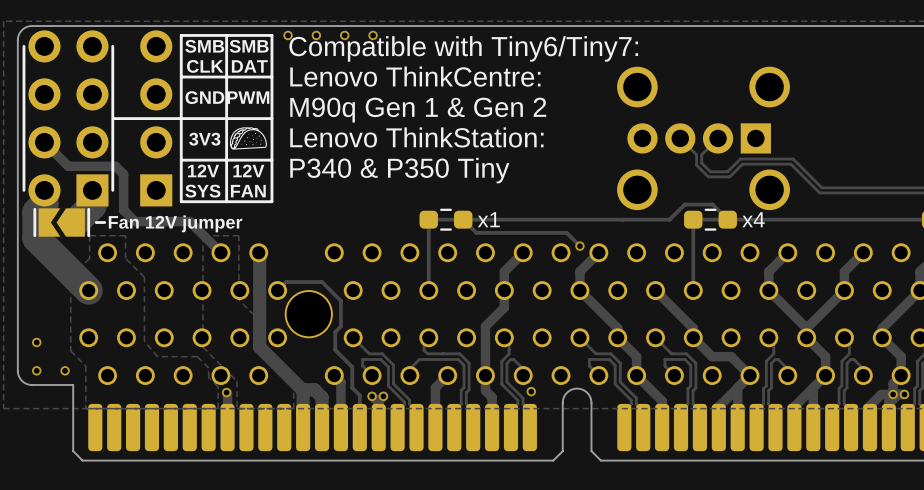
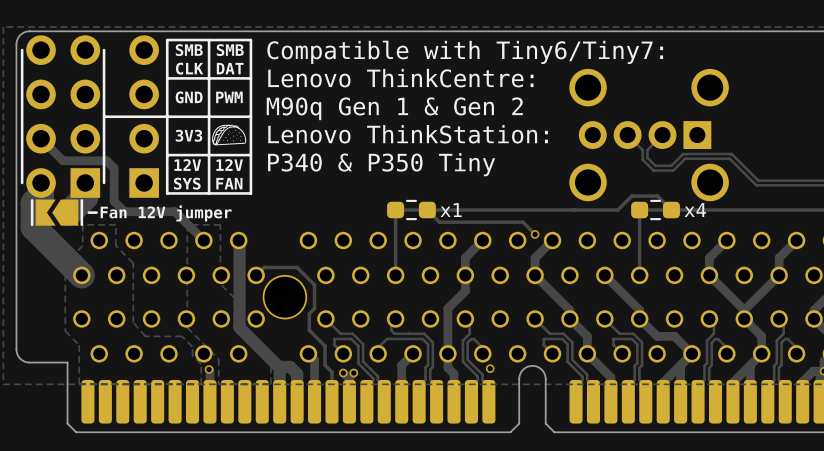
via: (288, 35) -> none
via: (316, 35) -> none
via: (344, 35) -> none
via: (373, 35) -> none
via: (36, 342) -> none
via: (36, 370) -> none
via: (65, 370) -> none

